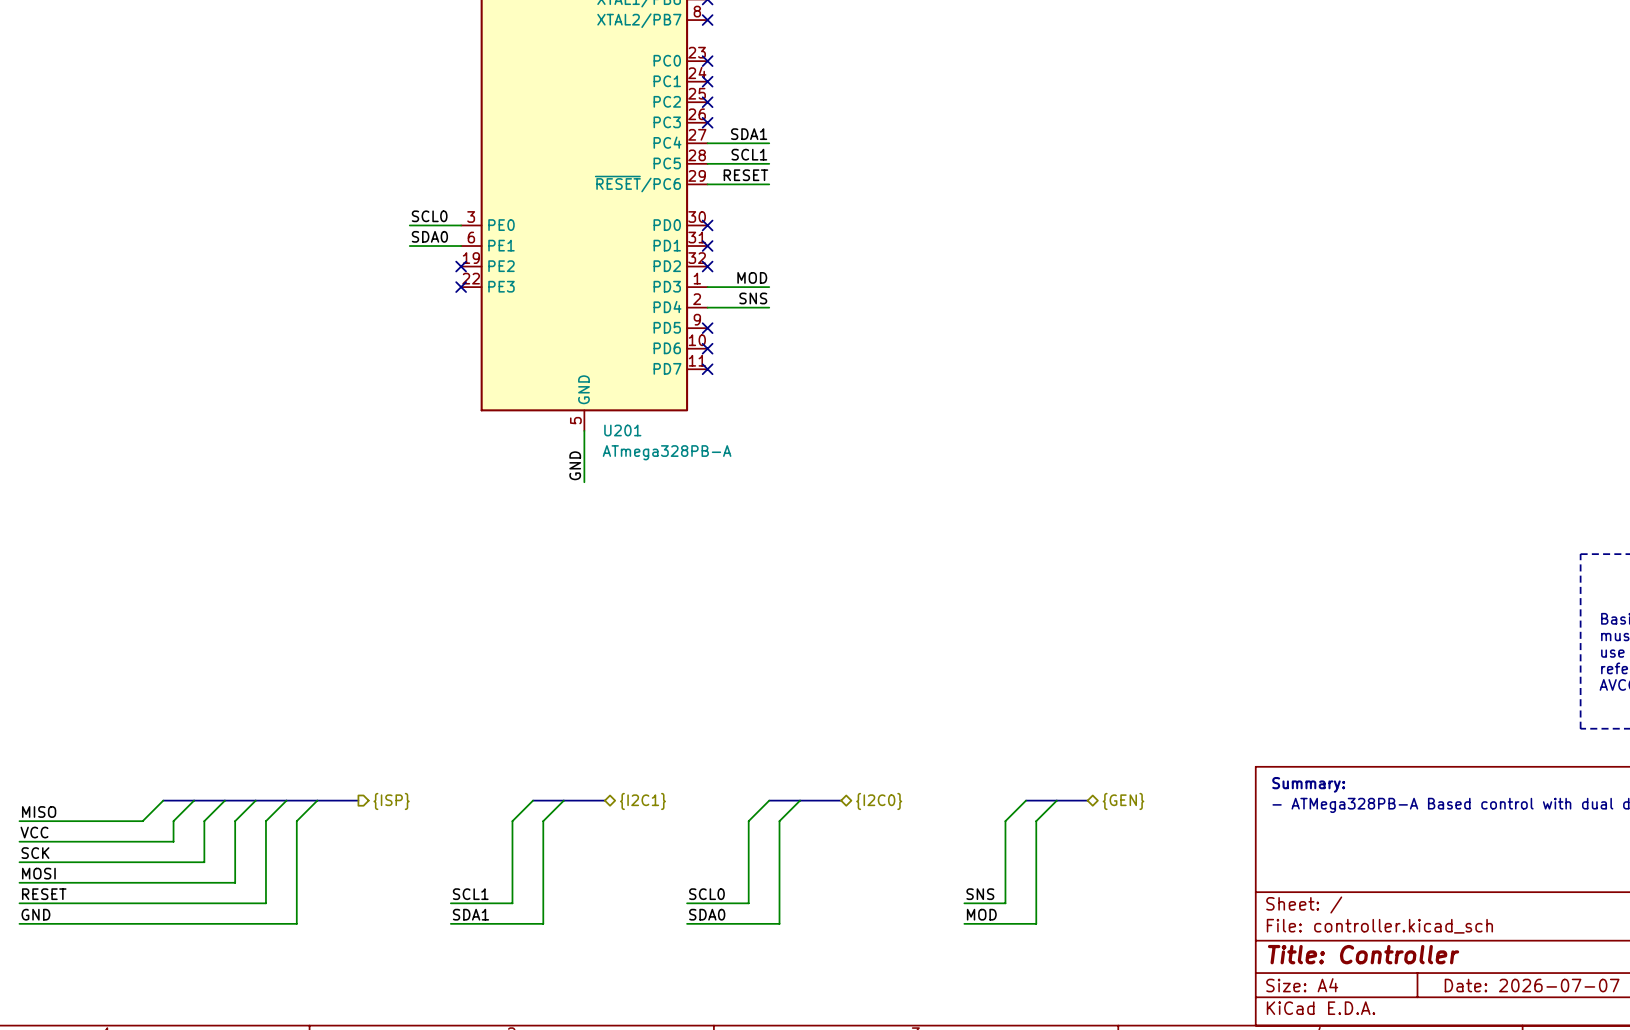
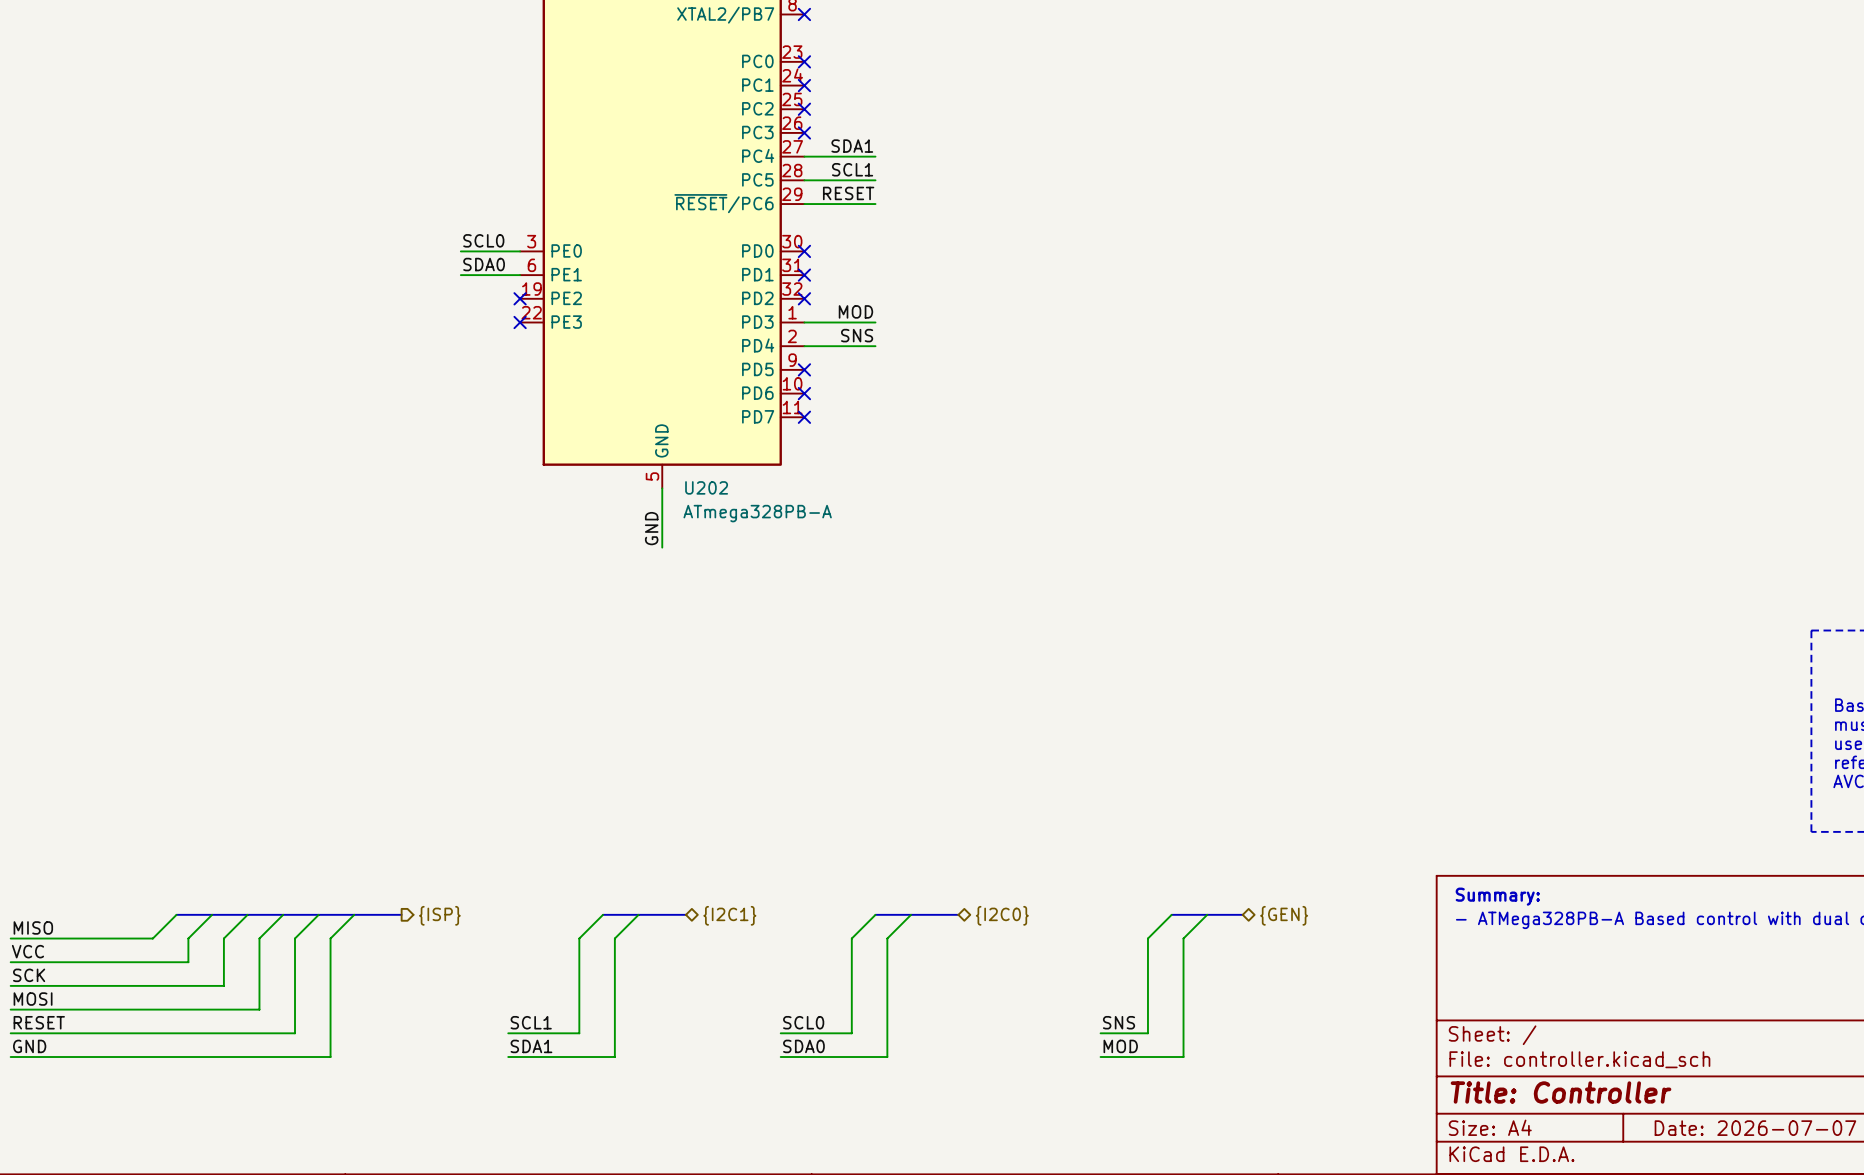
U201 name: U201 (622, 430) -> U202 (706, 487)

